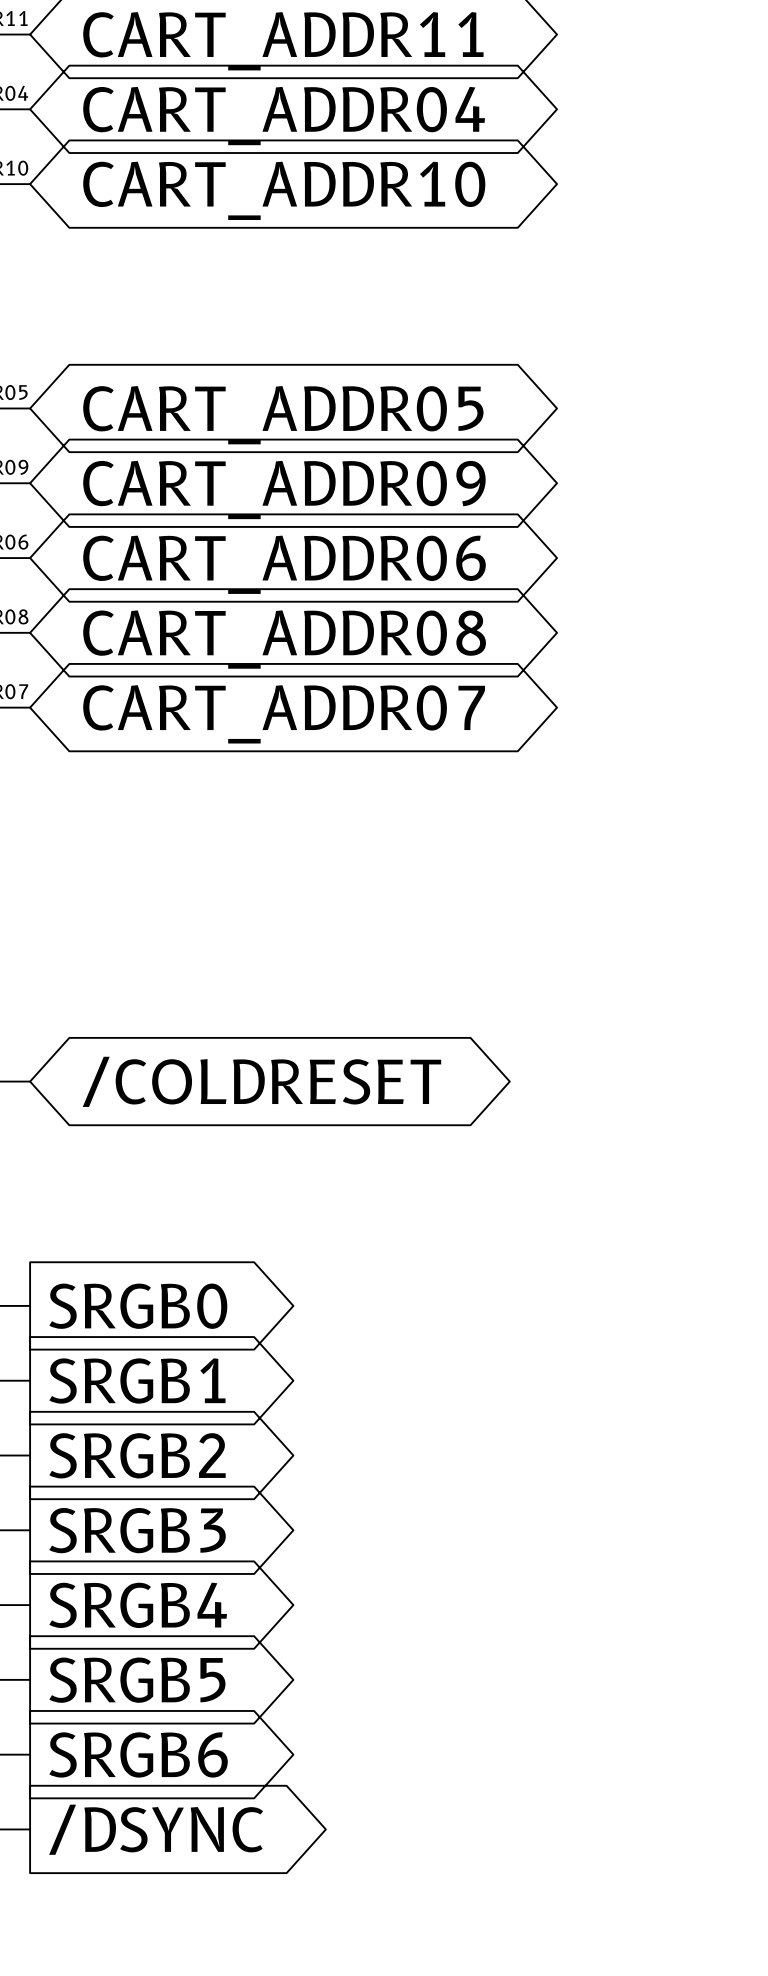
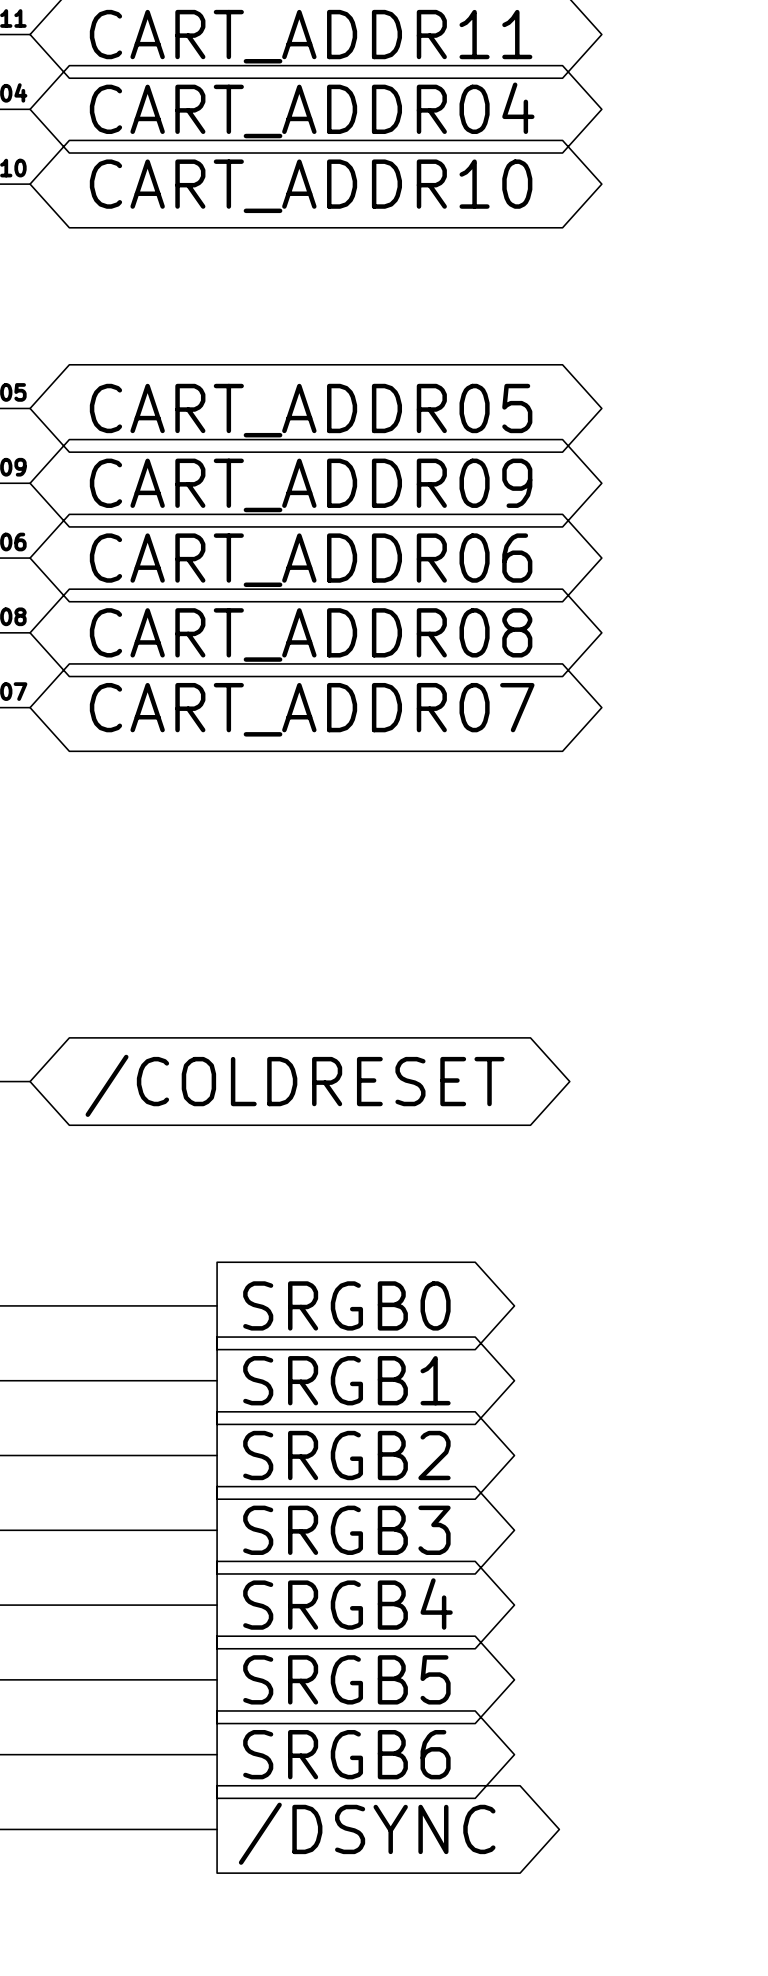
wire: none -> (30, 1305) (217, 1305)
global label position: SRGB0 (138, 1306) -> SRGB0 (346, 1305)
wire: none -> (30, 1380) (217, 1380)
global label position: SRGB1 (137, 1380) -> SRGB1 (346, 1380)
wire: none -> (30, 1455) (217, 1455)
global label position: SRGB2 (137, 1455) -> SRGB2 (346, 1455)
wire: none -> (30, 1530) (217, 1530)
global label position: SRGB3 (137, 1530) -> SRGB3 (346, 1530)
wire: none -> (30, 1605) (217, 1605)
global label position: SRGB4 (138, 1605) -> SRGB4 (347, 1604)
wire: none -> (30, 1679) (217, 1679)
global label position: SRGB5 (137, 1680) -> SRGB5 (346, 1679)
wire: none -> (30, 1754) (217, 1754)
global label position: SRGB6 (138, 1754) -> SRGB6 (346, 1754)
wire: none -> (30, 1829) (217, 1829)
global label position: /DSYNC (156, 1829) -> /DSYNC (367, 1833)

